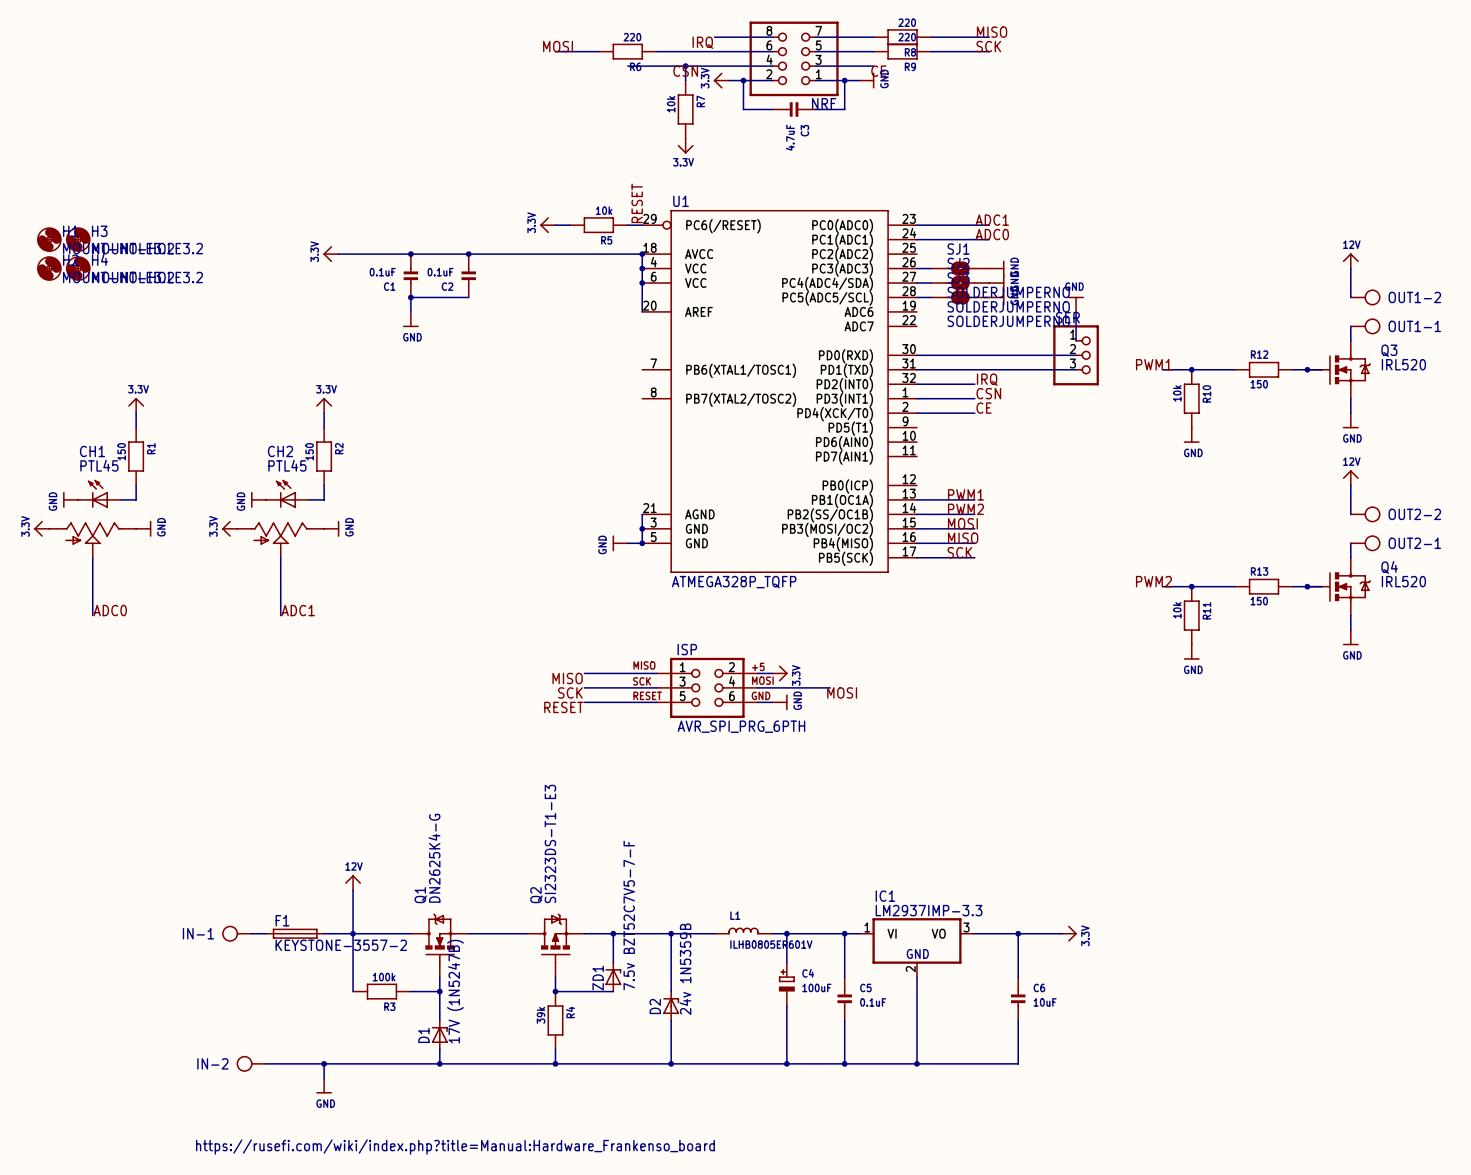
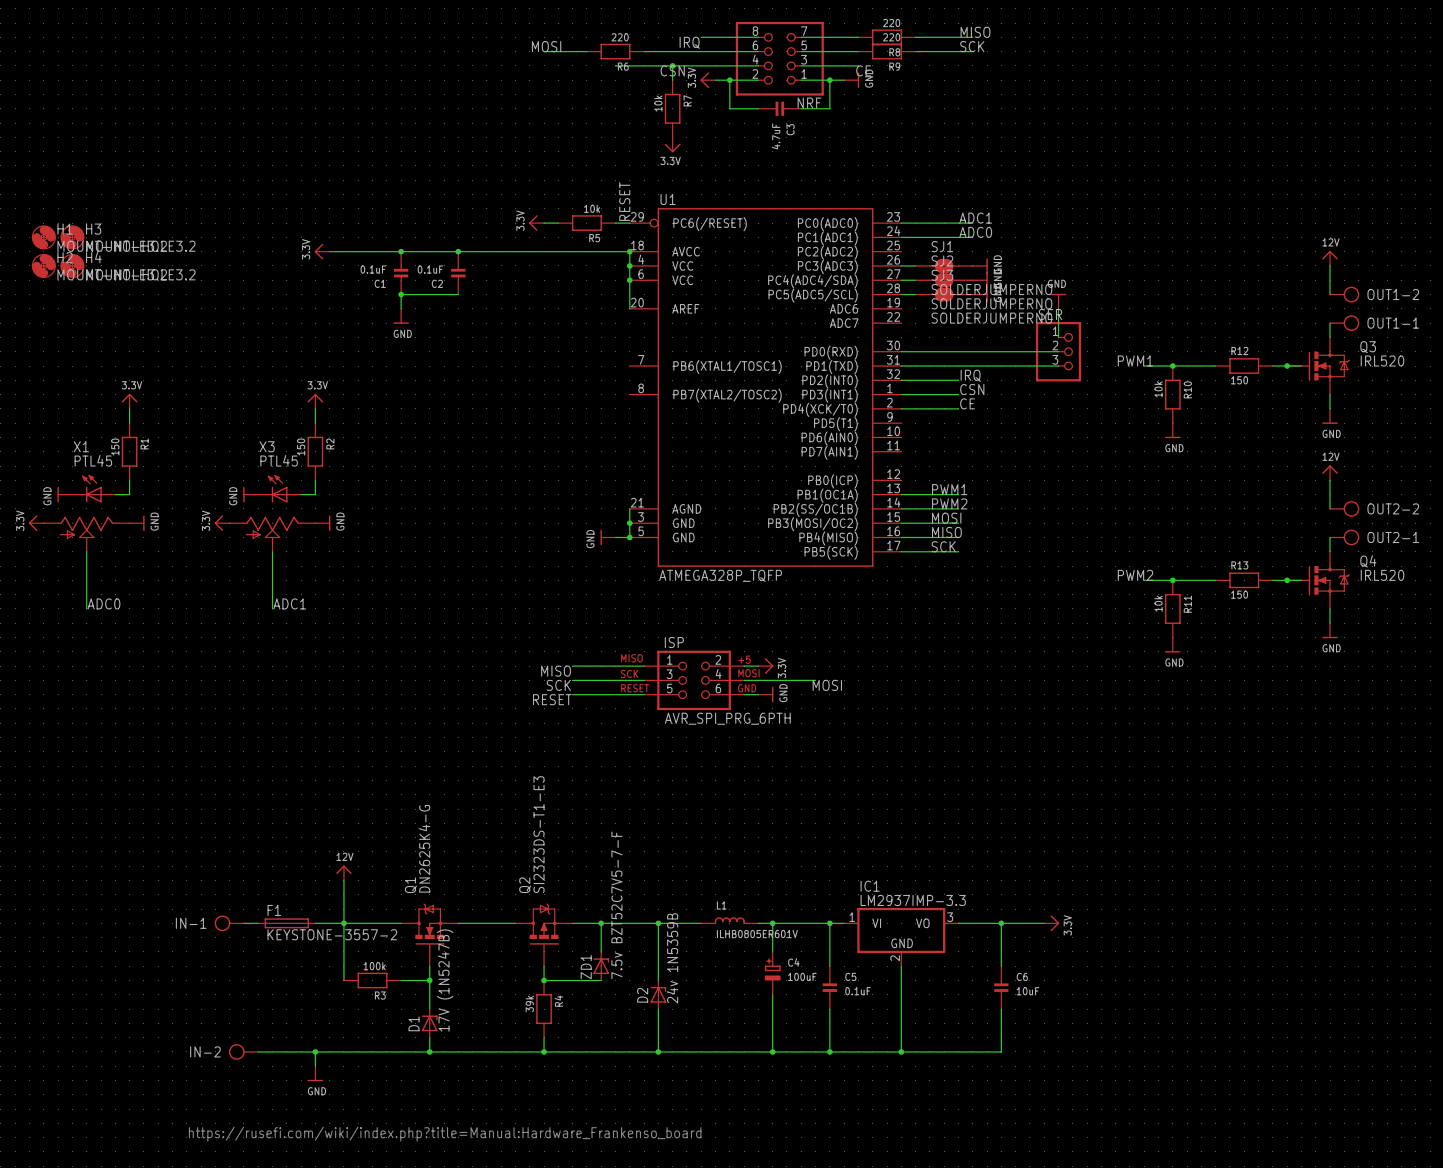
CH1 name: CH1 (92, 451) -> X1 (81, 446)
CH2 name: CH2 (280, 451) -> X3 (267, 446)

